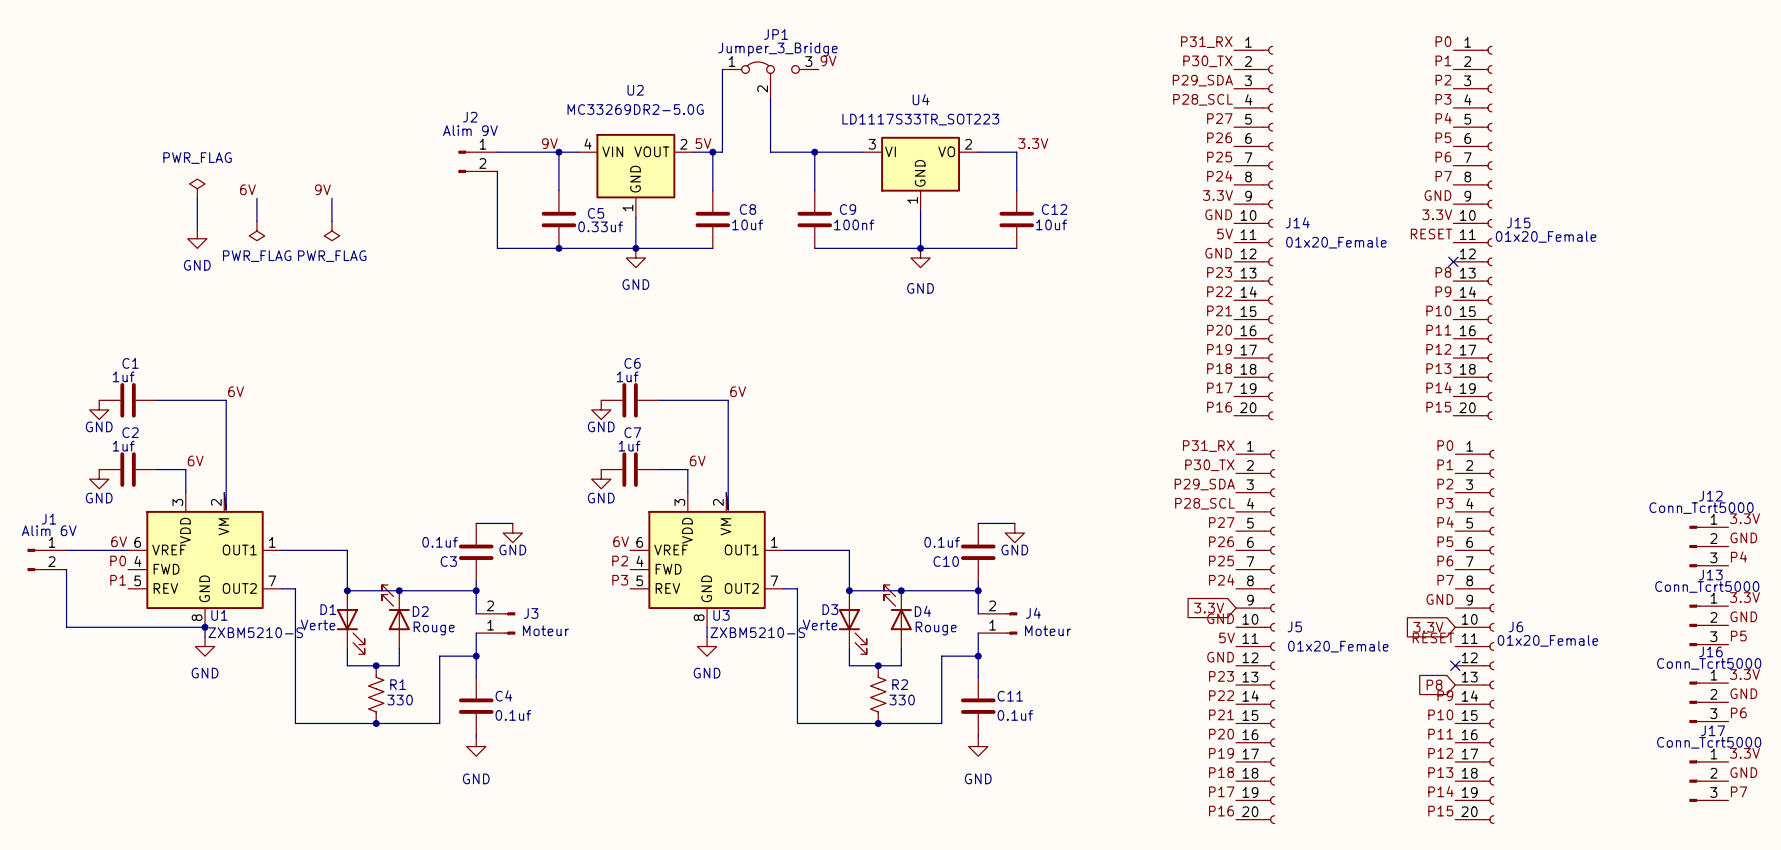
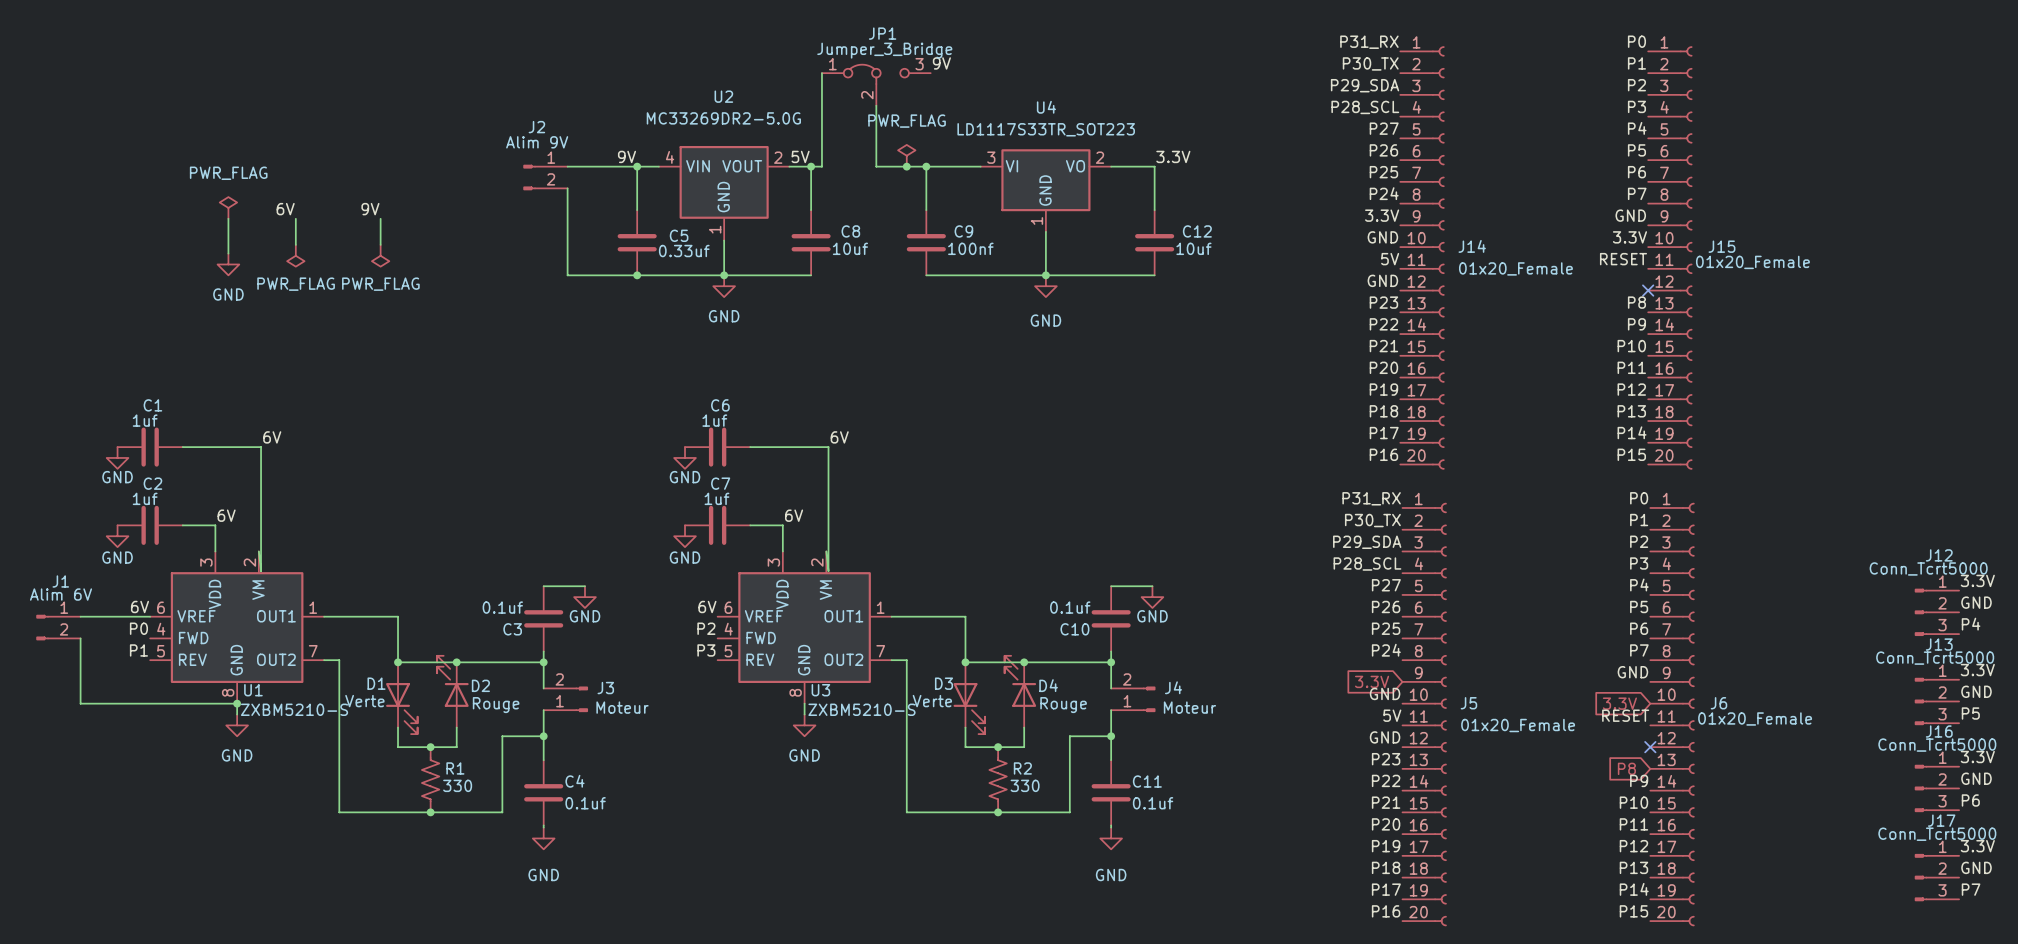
power symbol: none -> PWR_FLAG (906, 155)
junction: none -> (906, 166)

